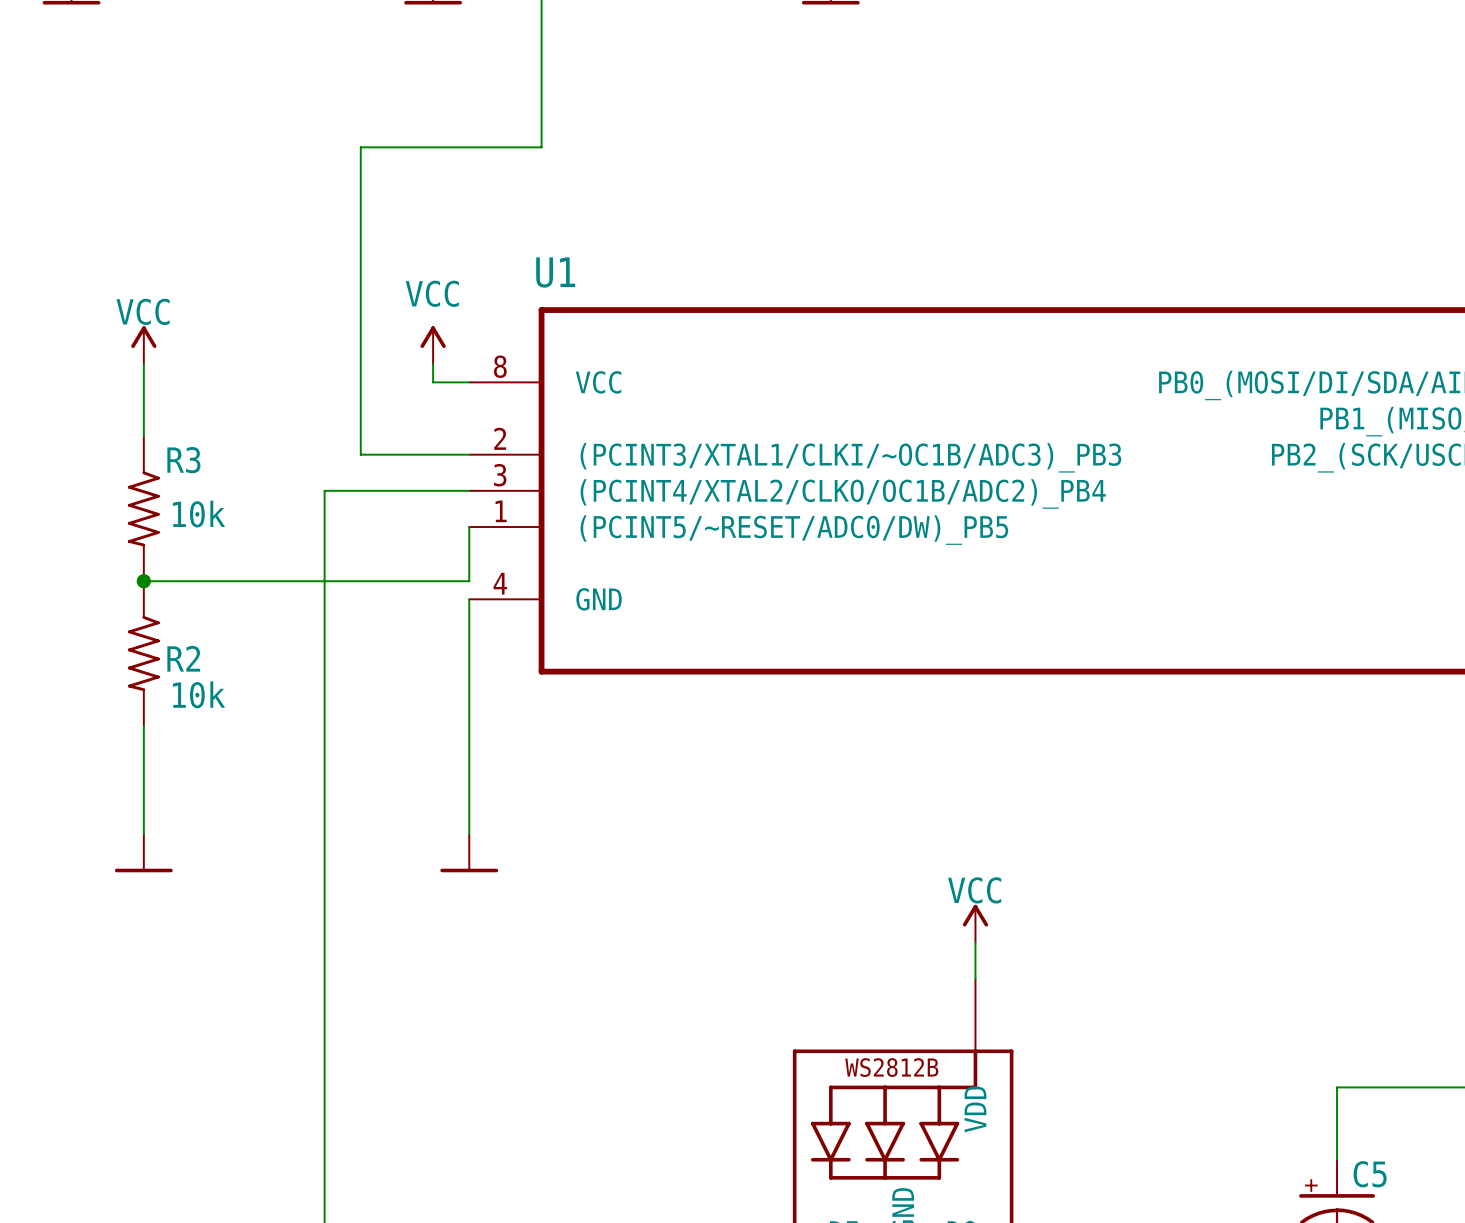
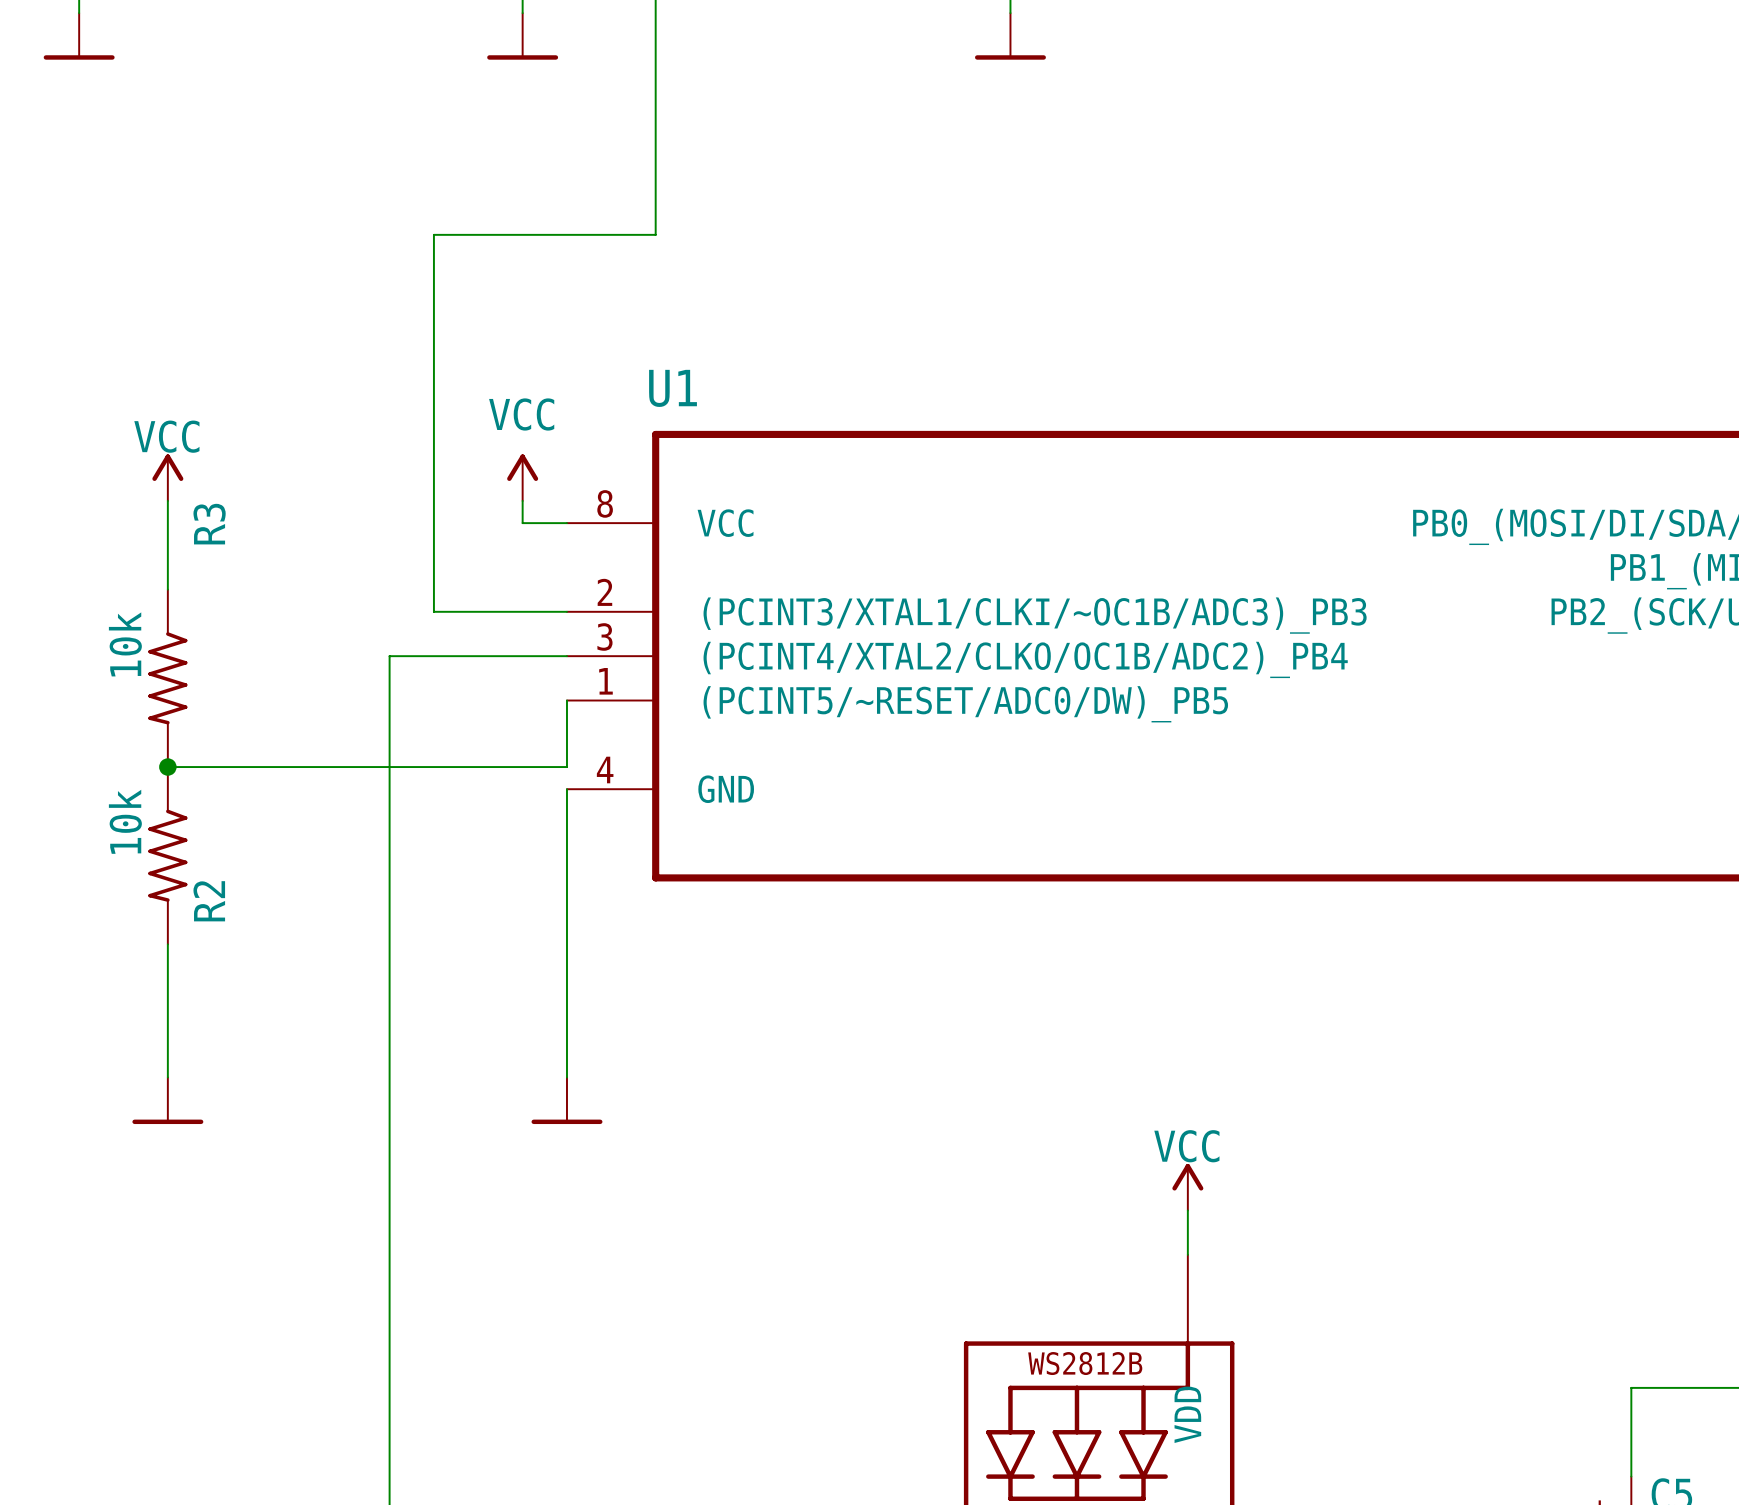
R3 name rotation: 0° (183, 460) -> 90° counterclockwise (209, 524)
R3 name position: R3 (183, 460) -> R3 (209, 524)
R3 value rotation: 0° (199, 514) -> 90° counterclockwise (125, 644)
R3 value position: 10k (199, 514) -> 10k (125, 644)
R2 name rotation: 0° (183, 658) -> 90° counterclockwise (209, 901)
R2 value rotation: 0° (199, 694) -> 90° counterclockwise (125, 821)
R2 value position: 10k (199, 694) -> 10k (125, 821)

